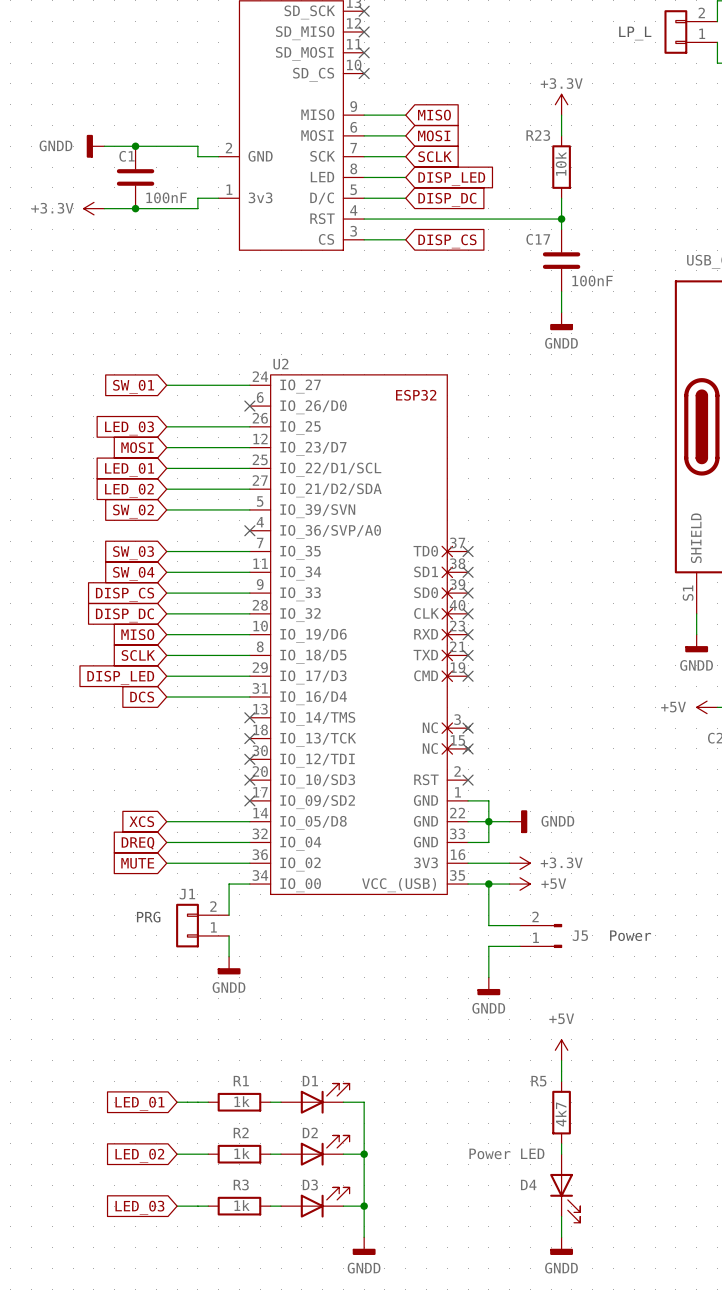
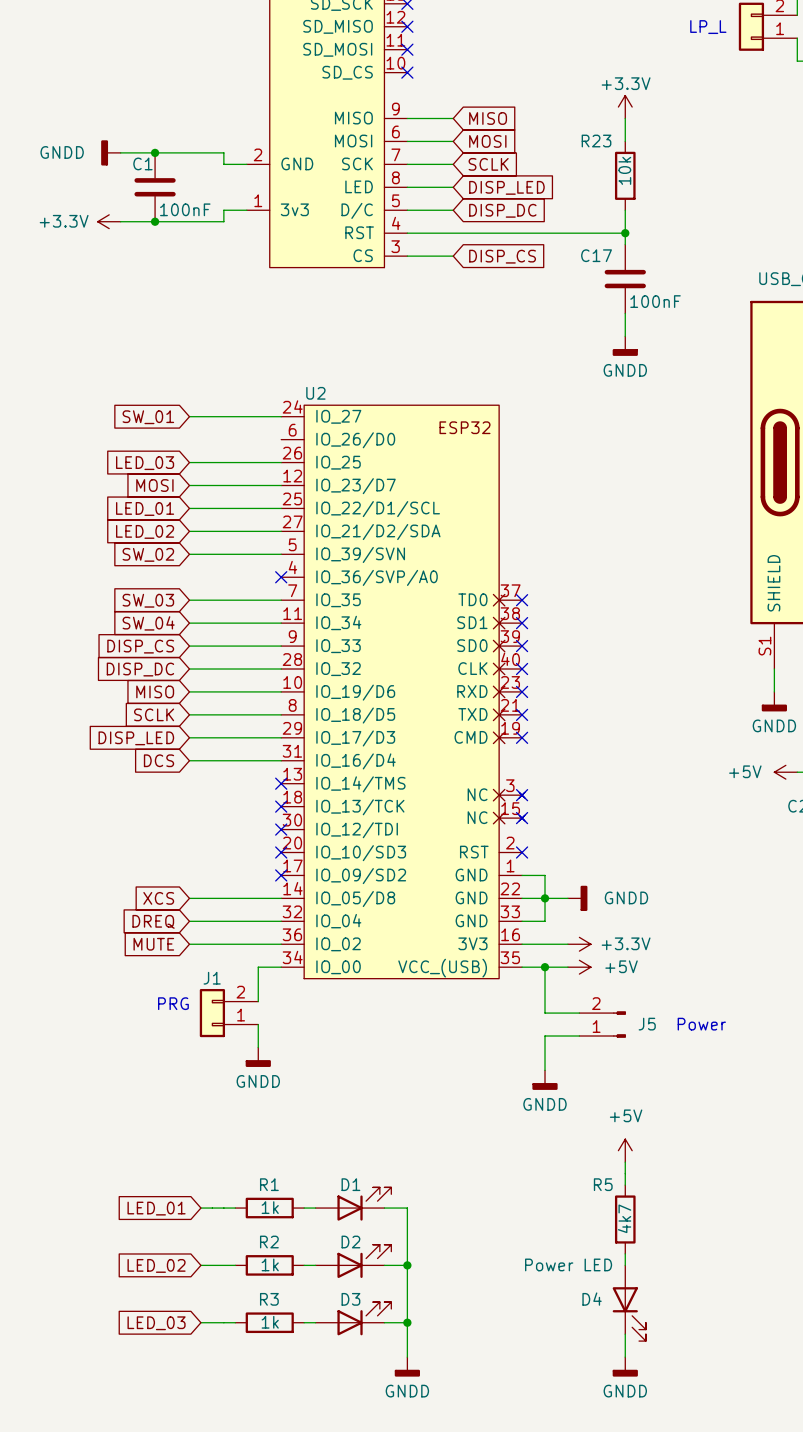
no-connect mark: (249, 406) -> none

